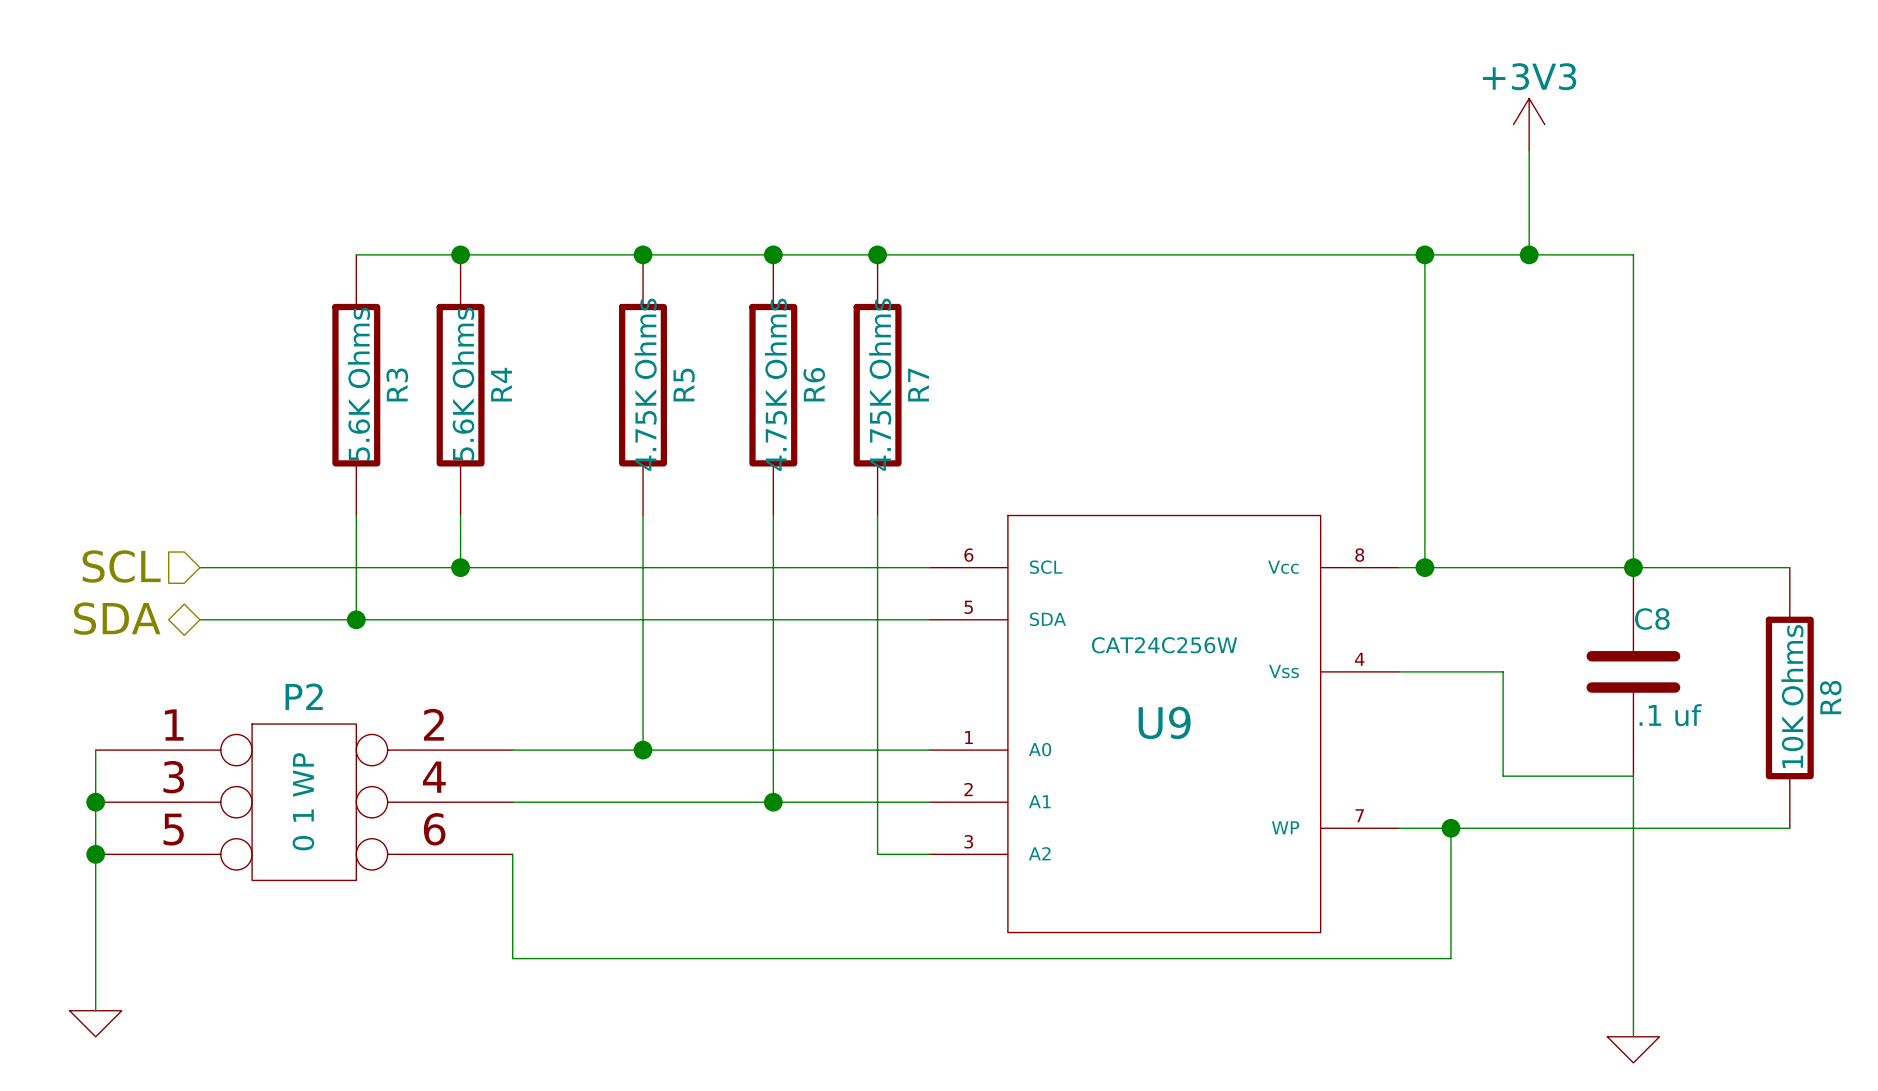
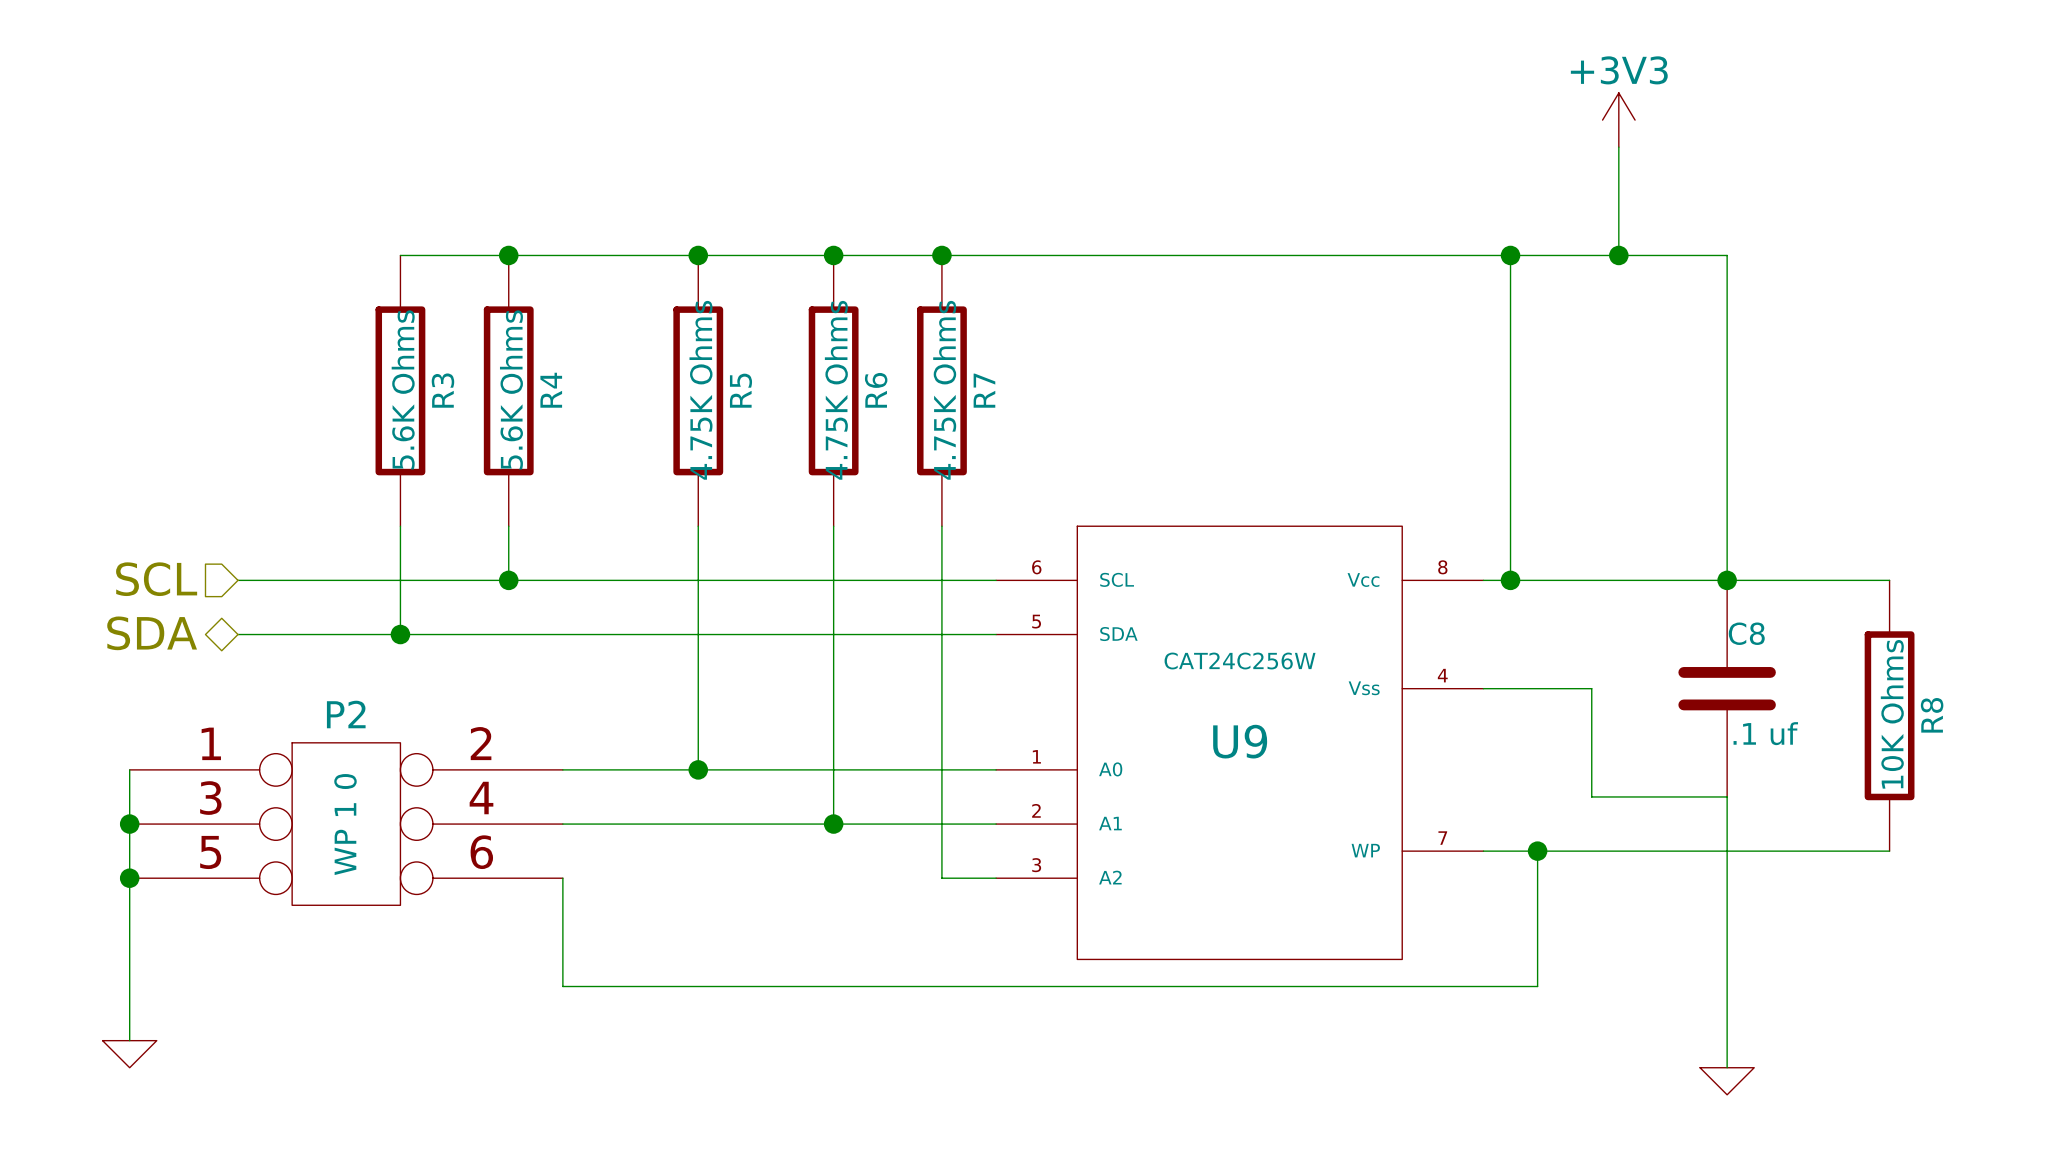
P2 value: 0 1 WP (303, 801) -> WP 1 0 (345, 824)

